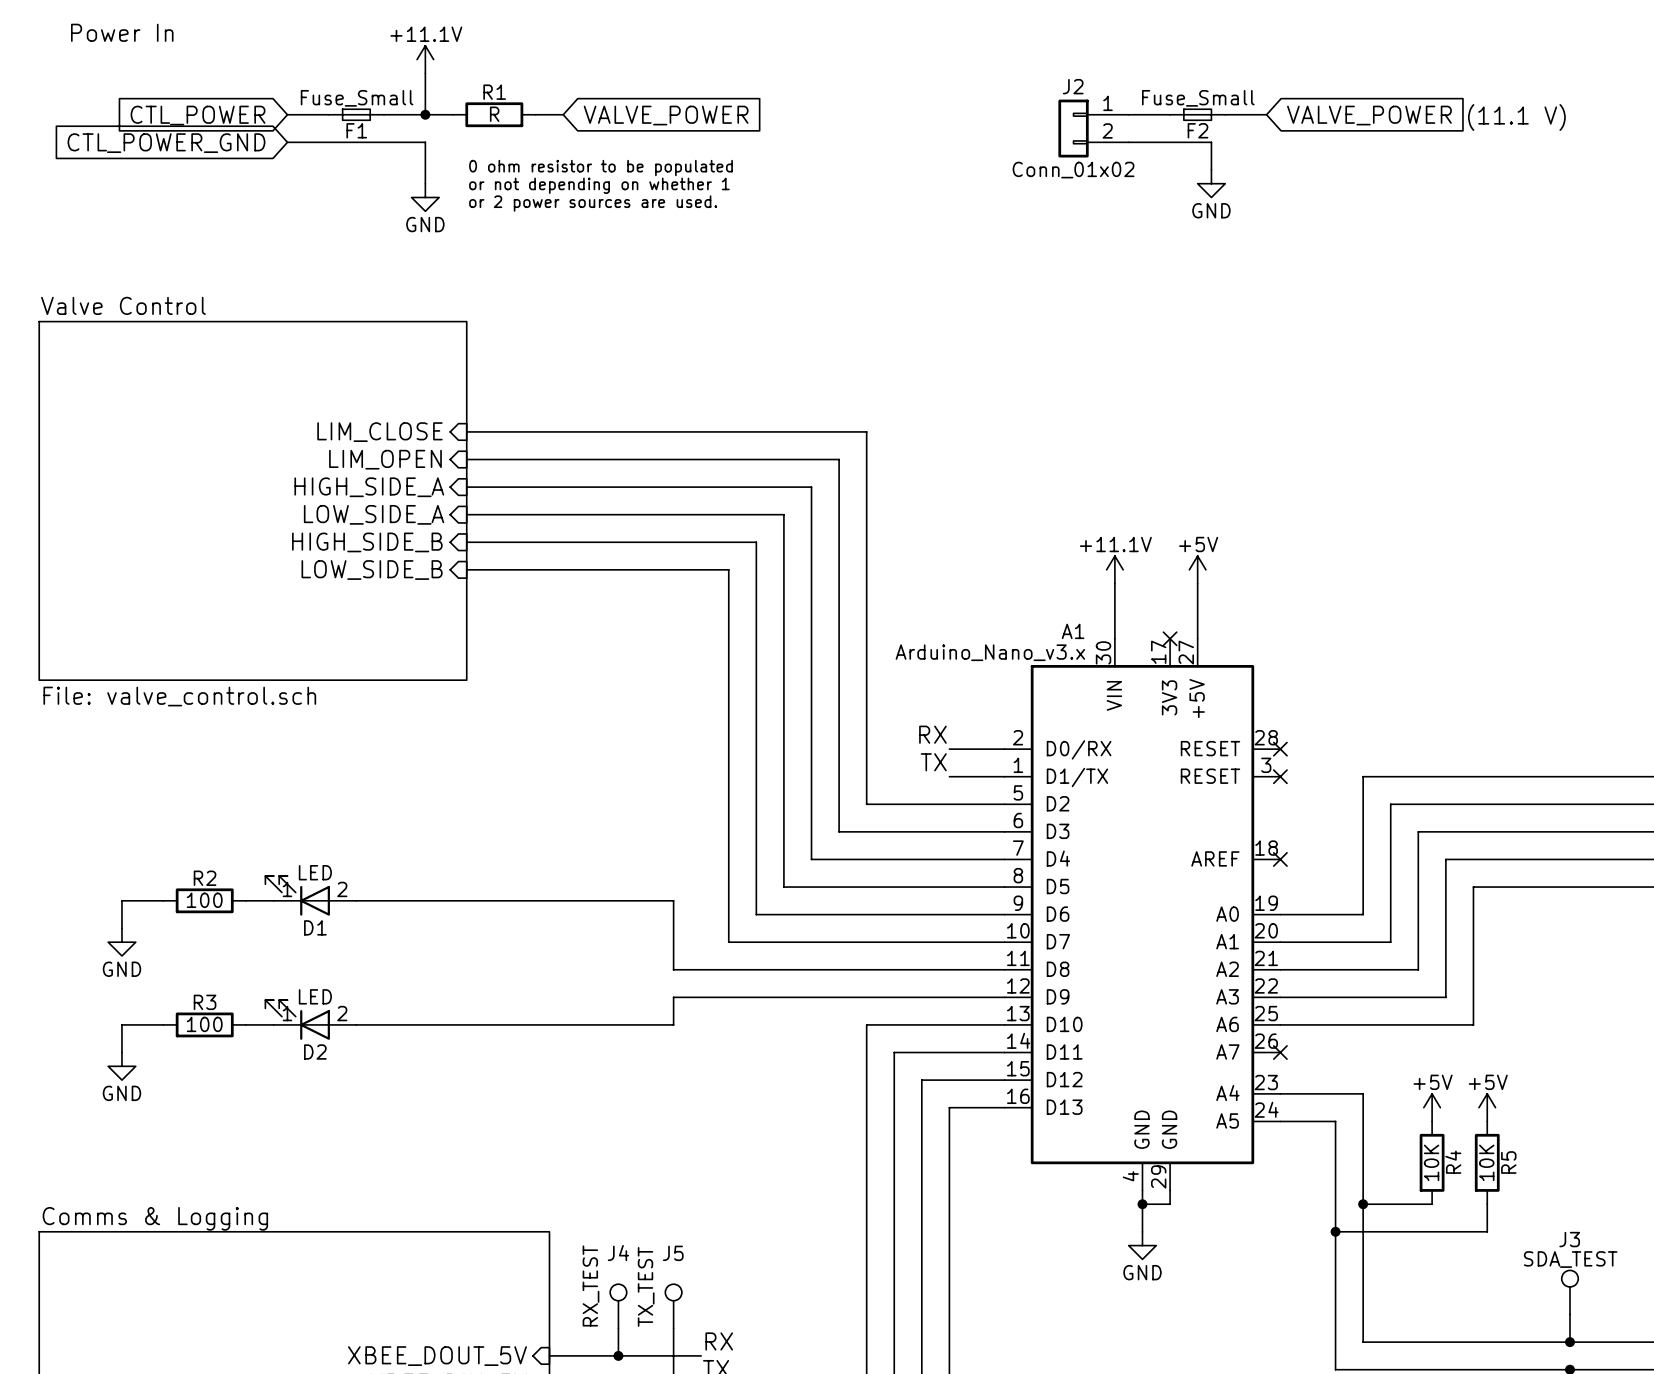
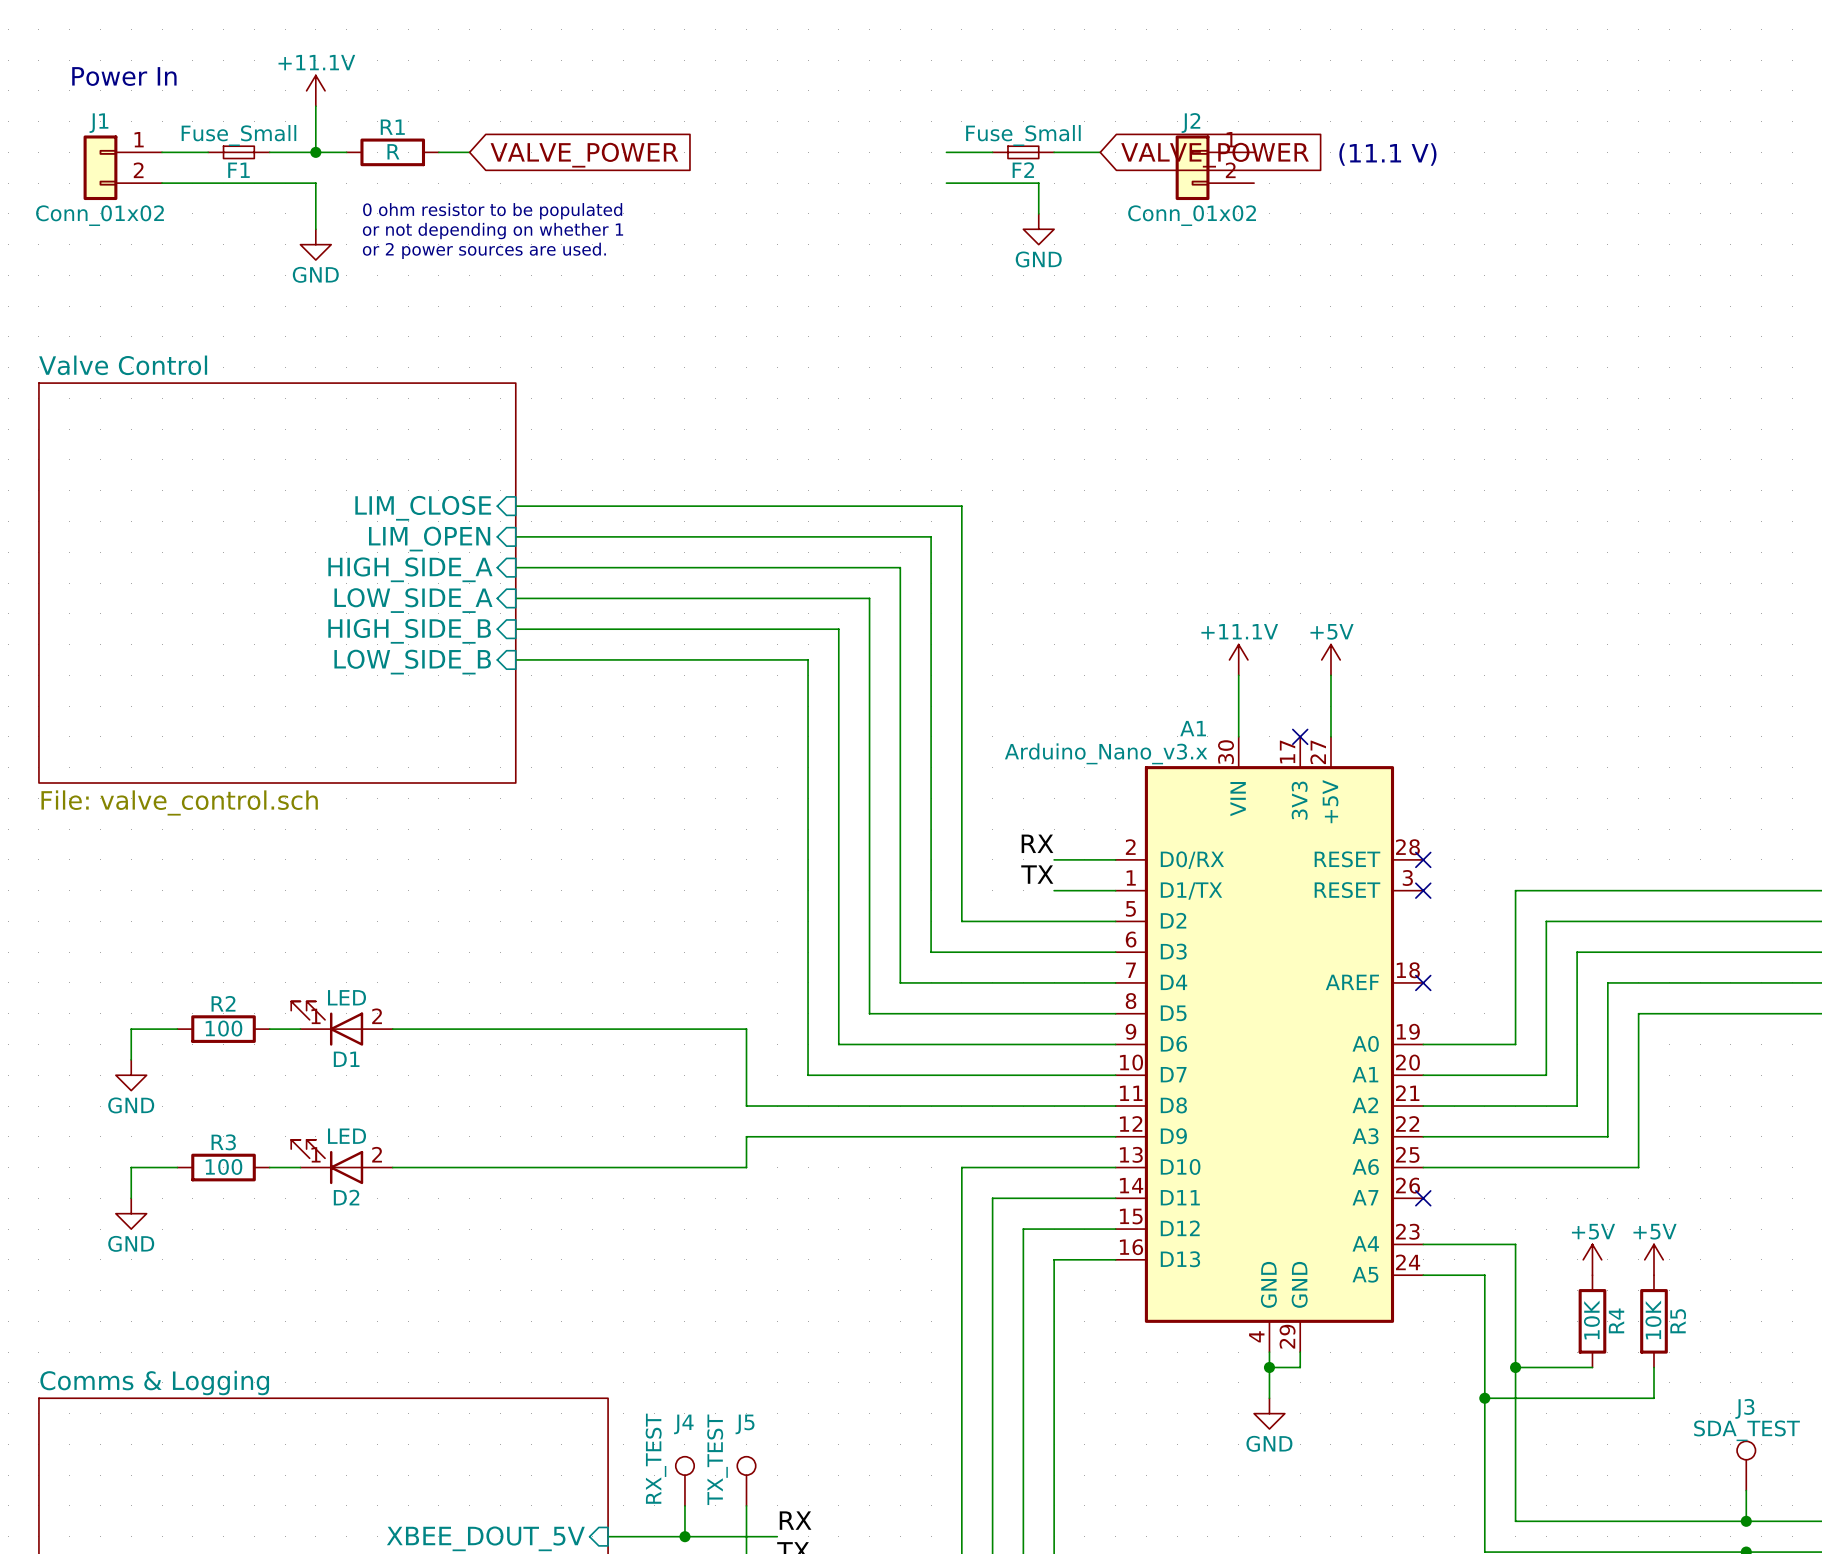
text position: Power In (122, 32) -> Power In (124, 76)
power symbol position: +11.1V (425, 59) -> +11.1V (315, 90)
wire: none -> (315, 106) (315, 152) (269, 152)
wire: (425, 73) (425, 114) (452, 114) -> none
wire: none -> (162, 152) (208, 152)
junction: none -> (315, 152)
F1 position: (356, 114) -> (238, 152)
junction: (425, 114) -> none
R1 position: (494, 114) -> (392, 152)
wire: (535, 114) (563, 114) -> none
wire: none -> (946, 152) (992, 152)
wire: (1128, 114) (1170, 114) -> (1054, 152) (1100, 152)
F2 position: (1197, 114) -> (1023, 152)
wire: (1225, 114) (1266, 114) -> none
global label: CTL_POWER (198, 115) -> none
global label position: VALVE_POWER (666, 115) -> VALVE_POWER (584, 155)
global label: none -> VALVE_POWER (1215, 155)
global label: VALVE_POWER (1369, 115) -> none
text: none -> (11.1 V) (1387, 154)
text: (11.1 V) (1516, 117) -> none
J1: none -> Conn_01x02 (122, 167)
wire: (287, 142) (425, 142) (425, 183) -> (162, 183) (315, 183) (315, 229)
wire: none -> (946, 183) (1038, 183) (1038, 213)
wire: (1128, 142) (1211, 142) (1211, 169) -> none
global label: CTL_POWER_GND (166, 143) -> none
text position: 0 ohm resistor to be populated (601, 168) -> 0 ohm resistor to be populated (492, 211)
power symbol: none -> GND (1038, 229)
power symbol: GND (1211, 183) -> none
text position: or not depending on whether 1 (599, 185) -> or not depending on whether 1 (493, 231)
power symbol position: GND (425, 197) -> GND (315, 244)
text position: or 2 power sources are used. (593, 203) -> or 2 power sources are used. (484, 250)

